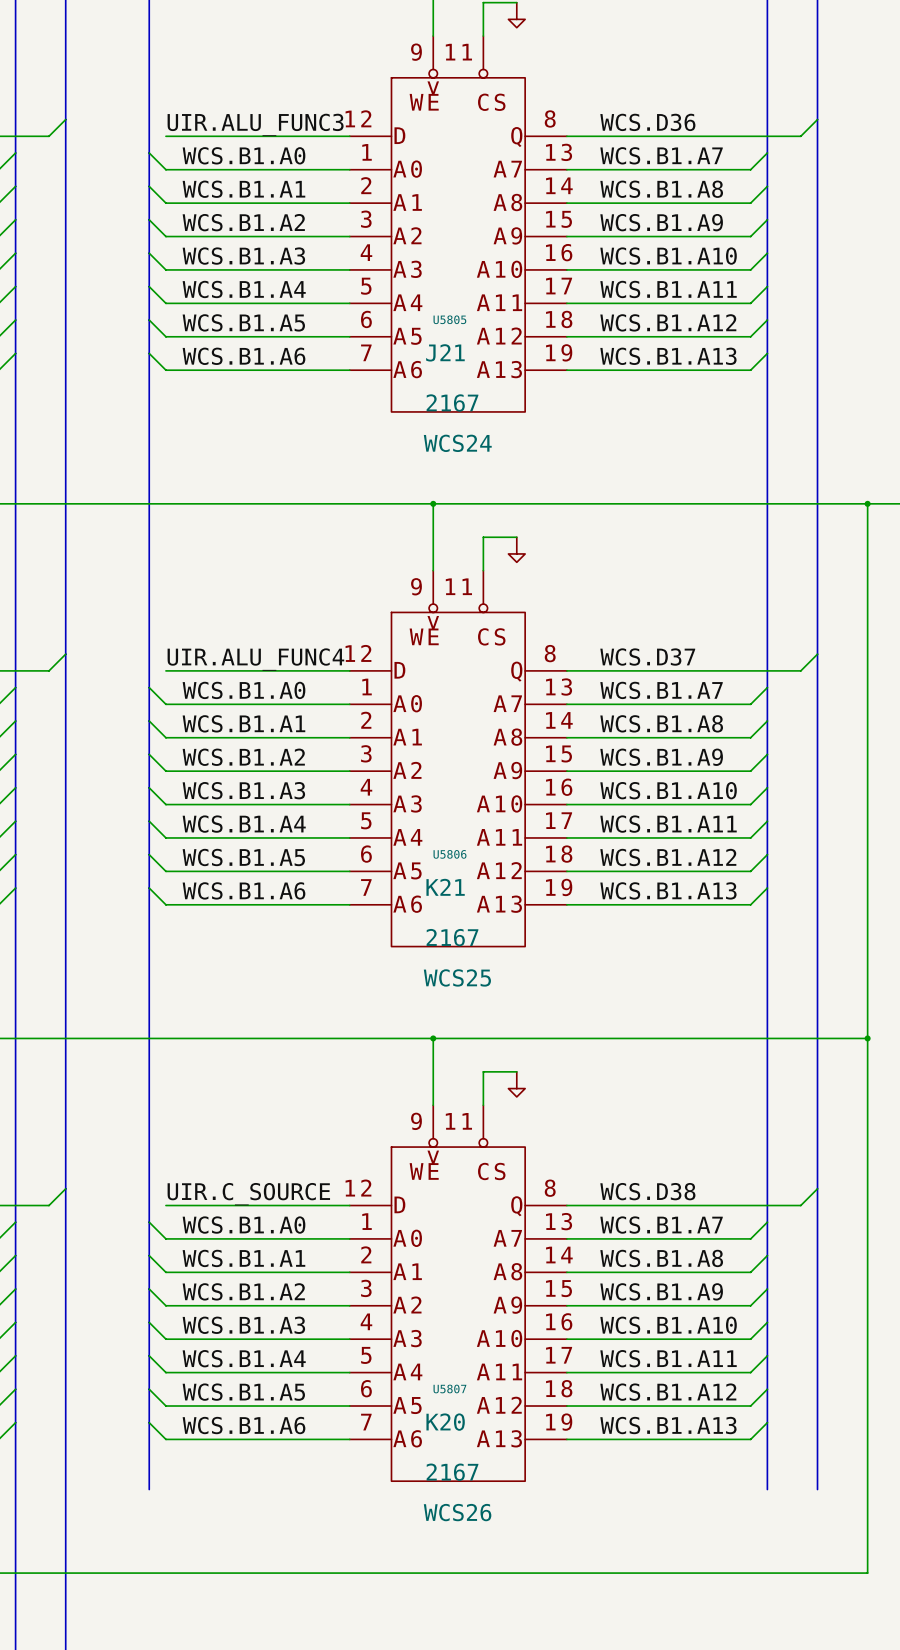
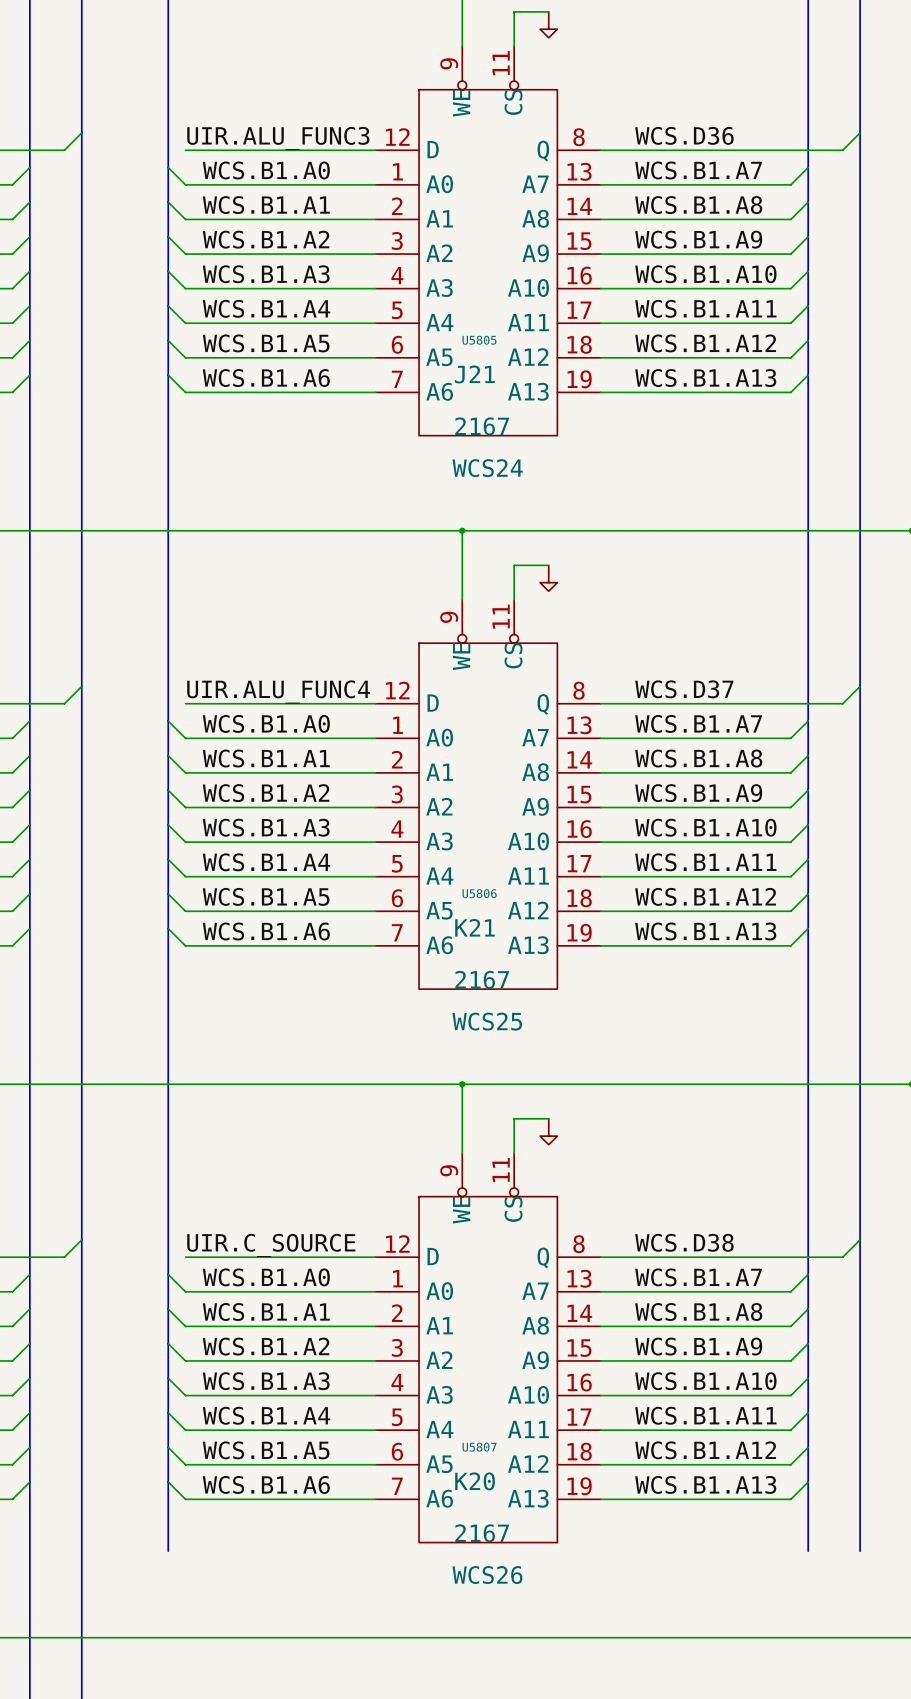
U5805 symbol: [349, 36, 567, 412] -> [375, 46, 601, 436]
U5806 symbol: [349, 570, 567, 947] -> [375, 599, 601, 990]
U5807 symbol: [349, 1105, 567, 1482] -> [375, 1153, 601, 1543]

